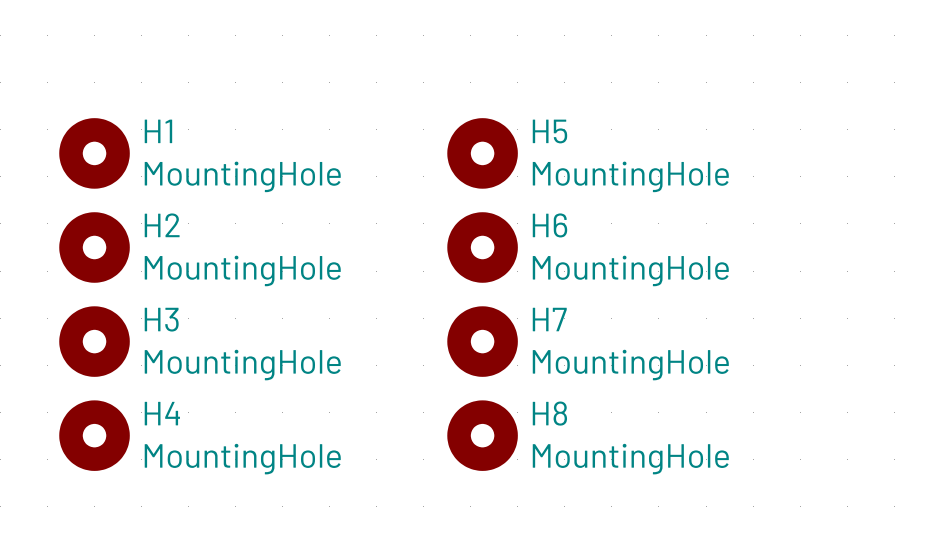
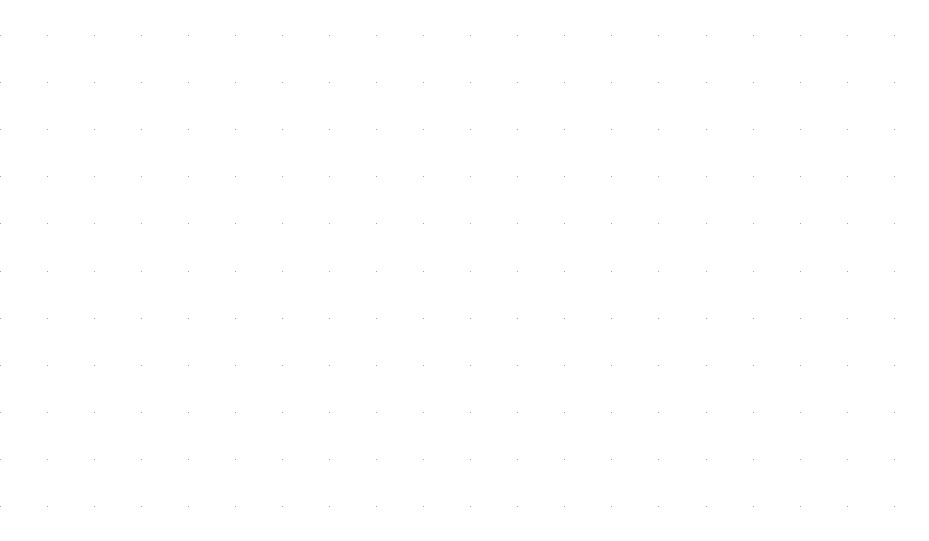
H1: MountingHole (94, 153) -> none
H5: MountingHole (482, 153) -> none
H2: MountingHole (94, 247) -> none
H6: MountingHole (482, 247) -> none
H3: MountingHole (94, 341) -> none
H7: MountingHole (482, 341) -> none
H4: MountingHole (94, 435) -> none
H8: MountingHole (482, 435) -> none

